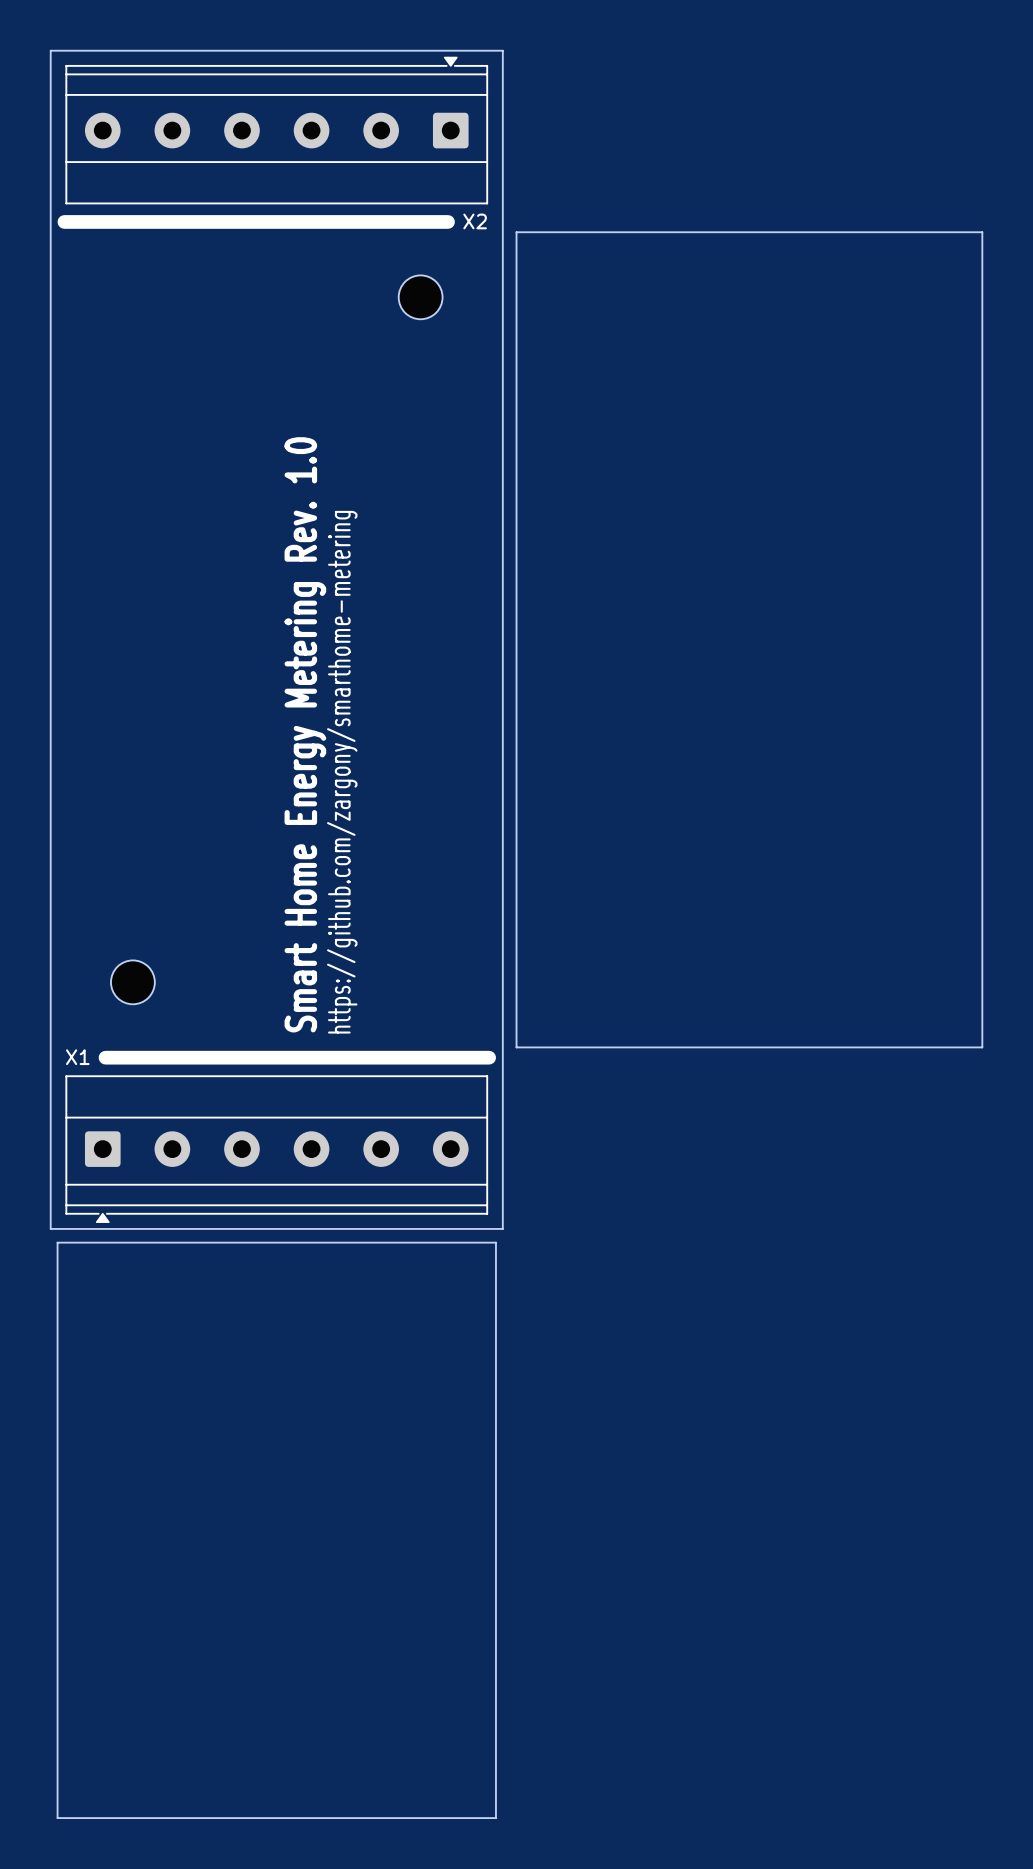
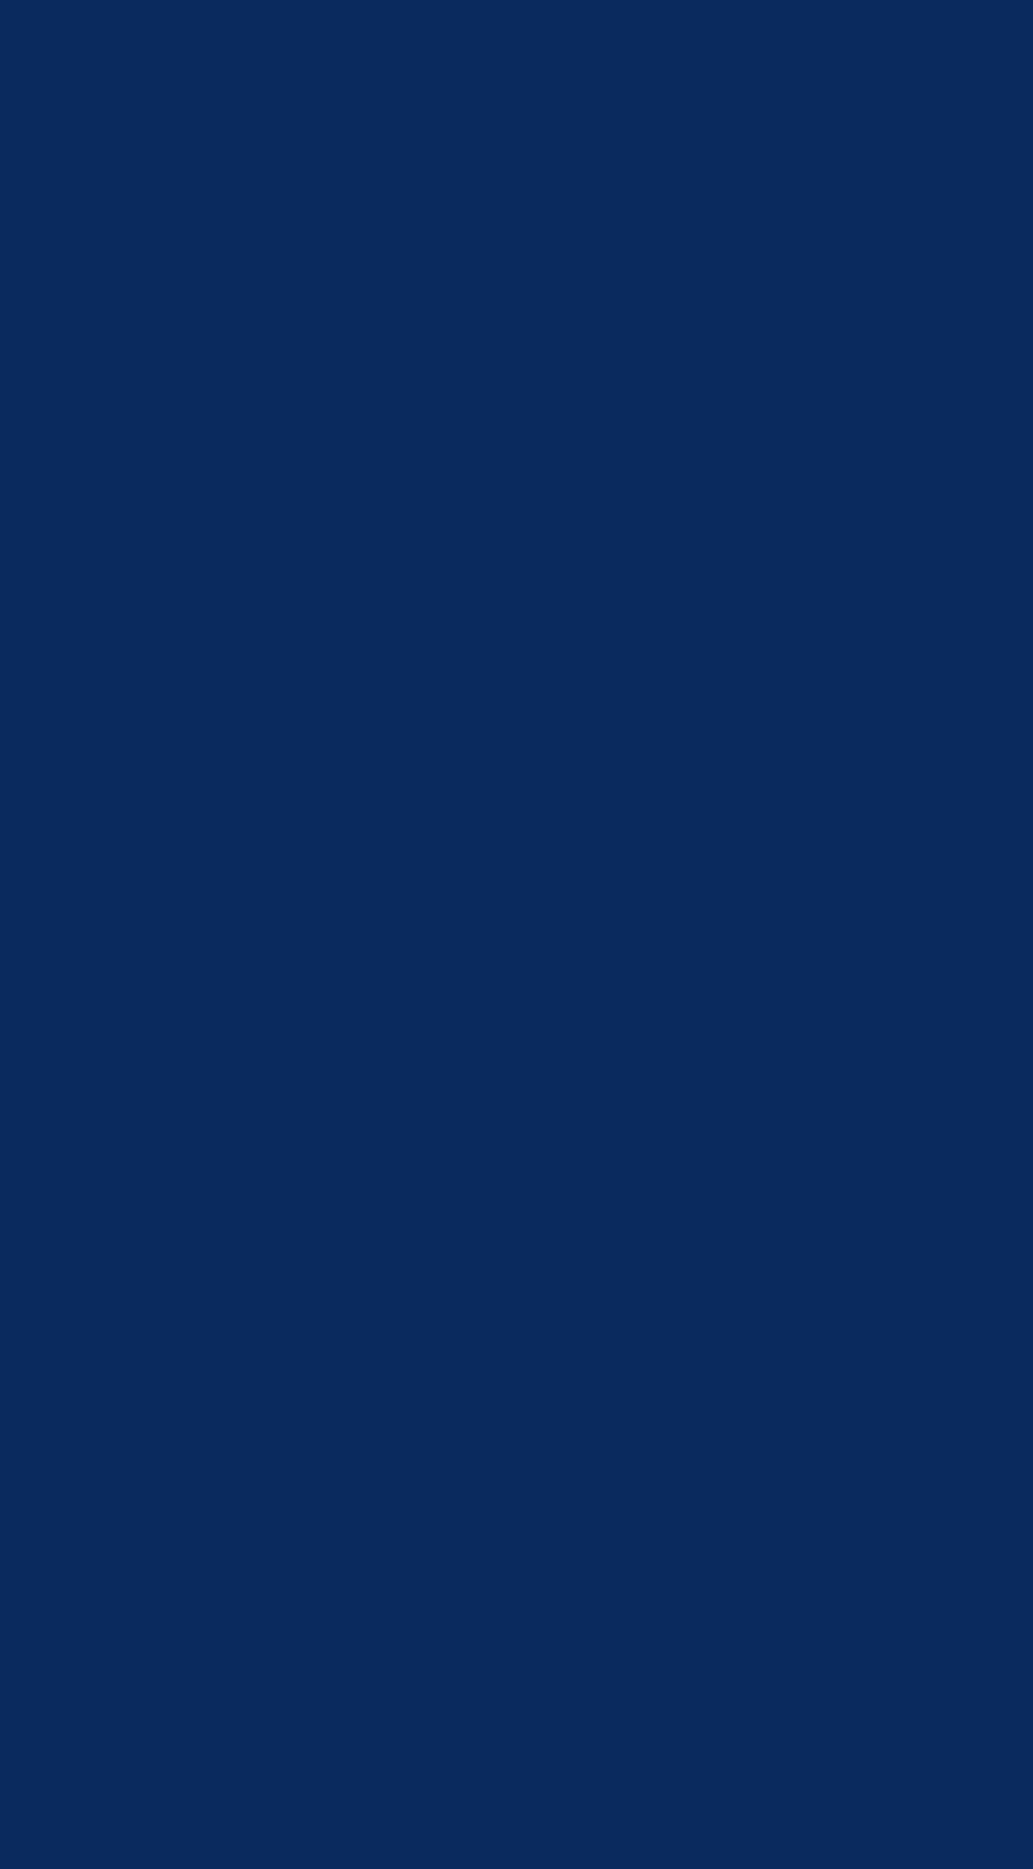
board edge: (50, 50) (50, 1228) (502, 1228) (502, 50) (50, 50) -> none
X2: (276, 130) -> none
line: (64, 221) (448, 221) -> none
board edge: (516, 232) (516, 1047) (982, 1047) (982, 232) (516, 232) -> none
part: (420, 297) -> none
text: Smart Home Energy Metering Rev. 1.0 (305, 734) -> none
text: https://github.com/zargony/smarthome-metering (342, 772) -> none
part: (132, 982) -> none
line: (105, 1057) (489, 1057) -> none
X1: (276, 1149) -> none
board edge: (57, 1242) (495, 1242) (495, 1818) (57, 1818) (57, 1242) -> none

